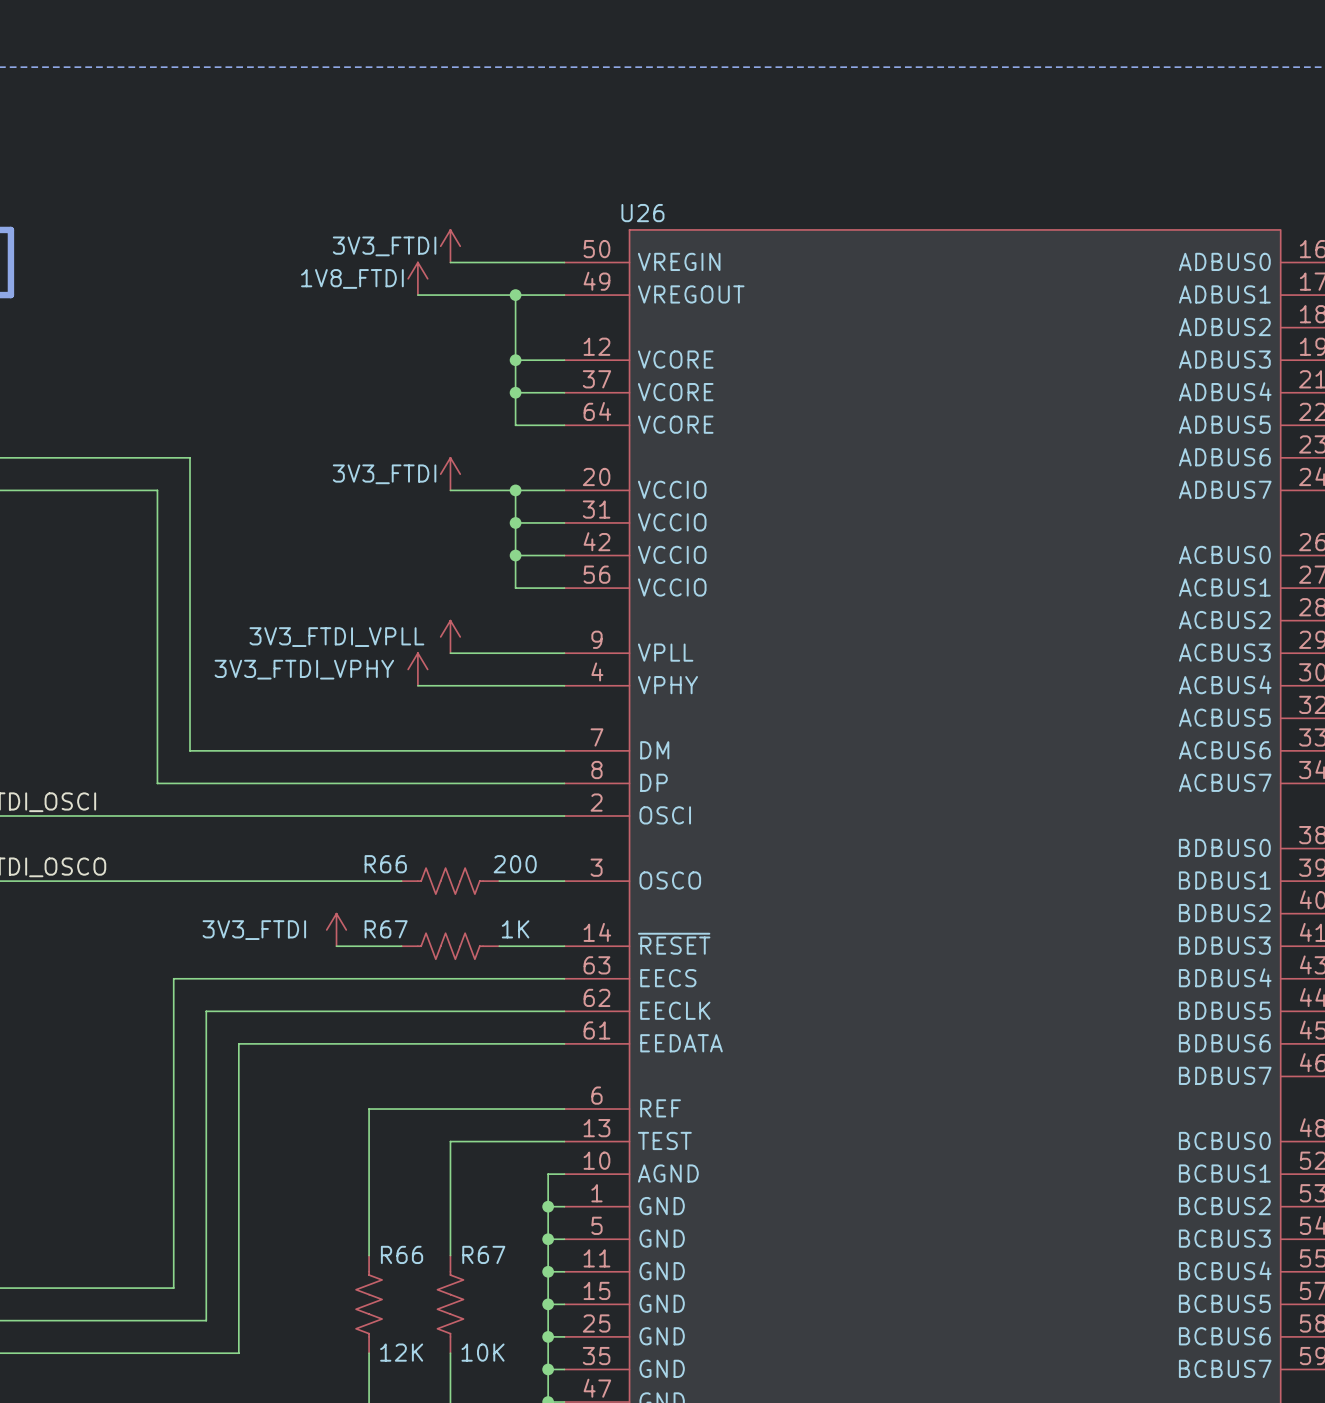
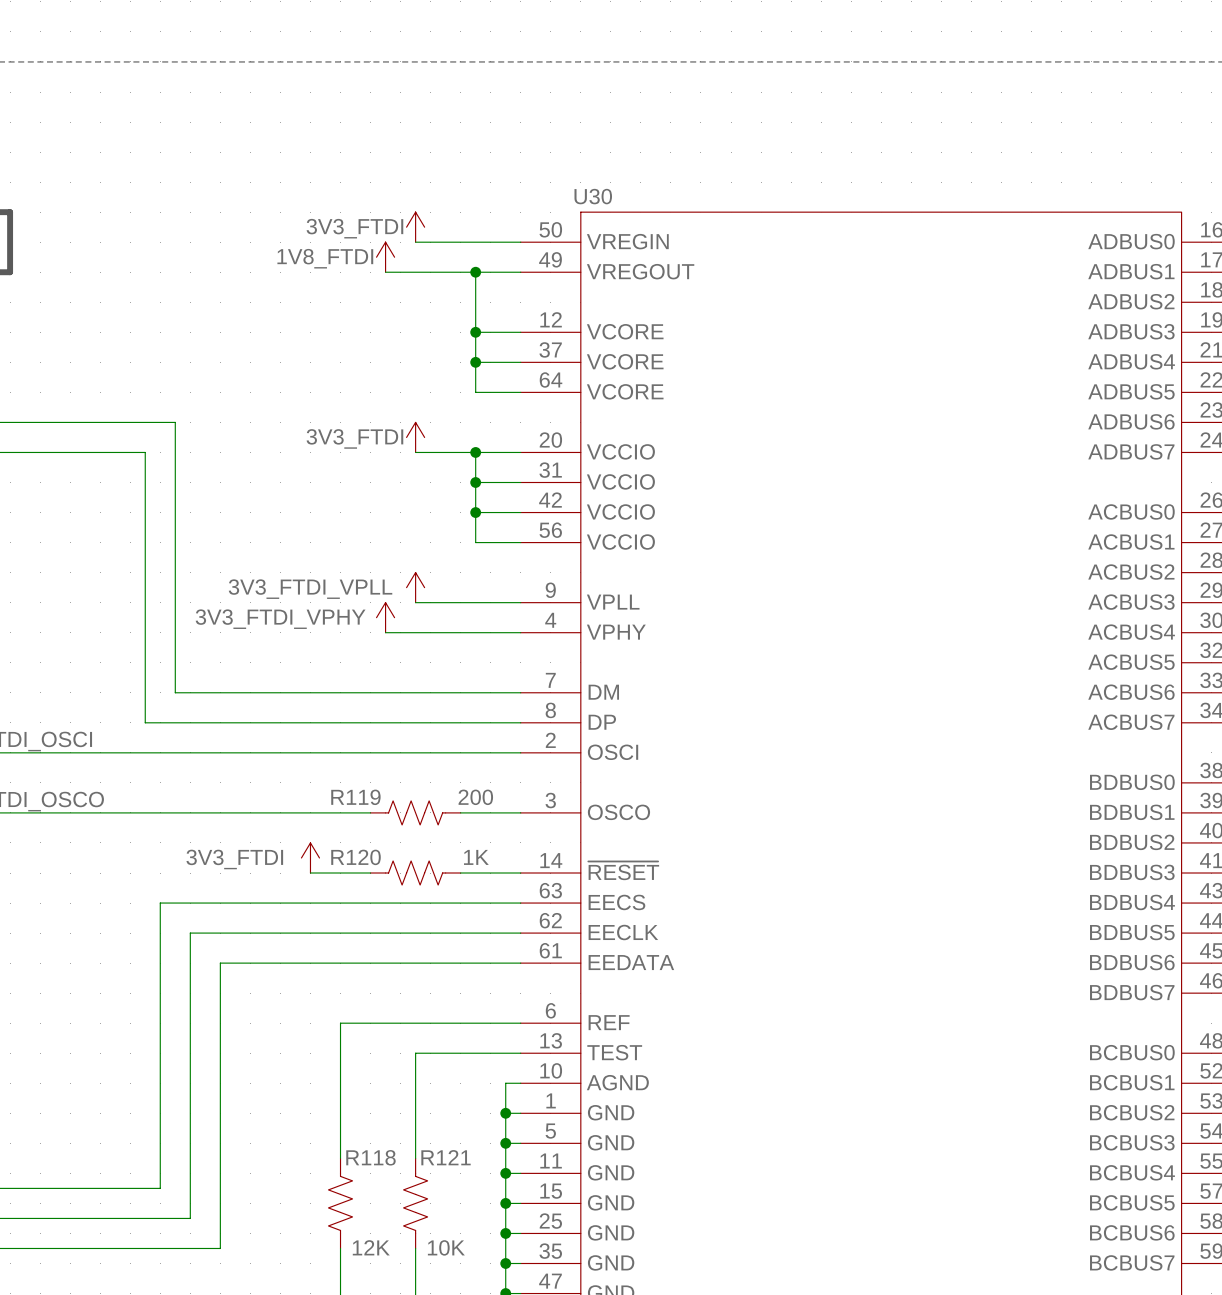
U26 name: U26 (642, 213) -> U30 (593, 196)
R66 name: R66 (385, 864) -> R119 (355, 797)
R67 name: R67 (386, 929) -> R120 (356, 857)
R66 name: R66 (402, 1254) -> R118 (370, 1157)
R67 name: R67 (483, 1254) -> R121 (446, 1157)

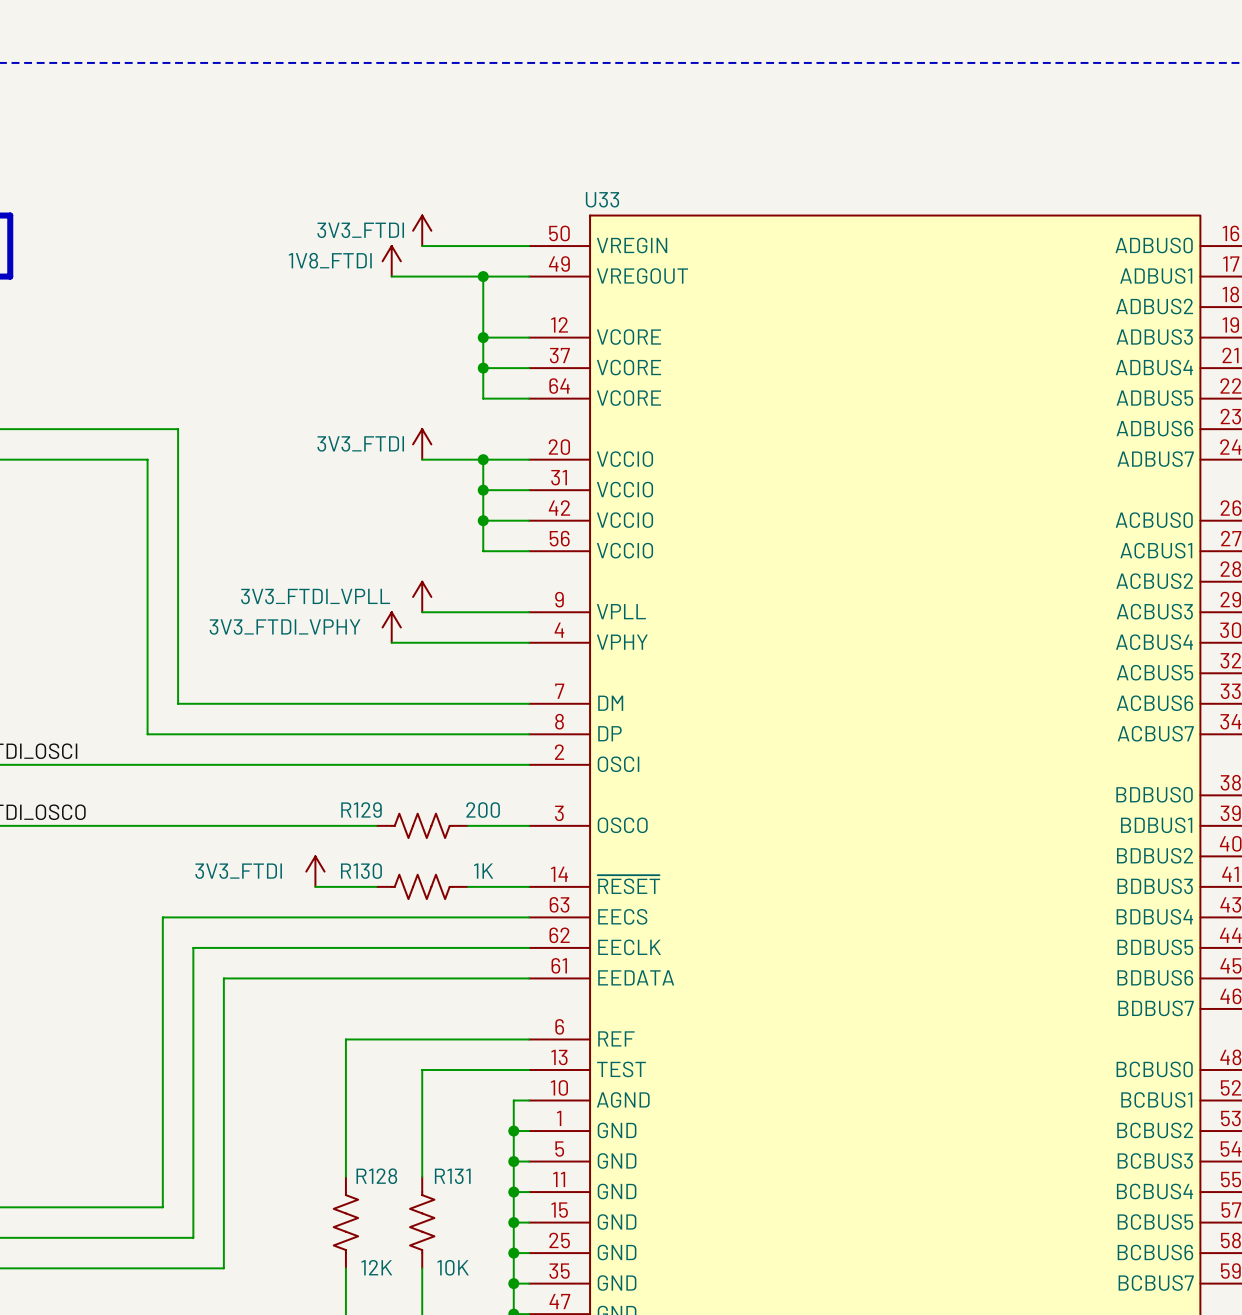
U30 name: U30 (593, 196) -> U33 (602, 199)
R119 name: R119 (355, 797) -> R129 (361, 810)
R120 name: R120 (356, 857) -> R130 (361, 871)
R118 name: R118 (370, 1157) -> R128 (376, 1176)
R121 name: R121 (446, 1157) -> R131 (452, 1176)

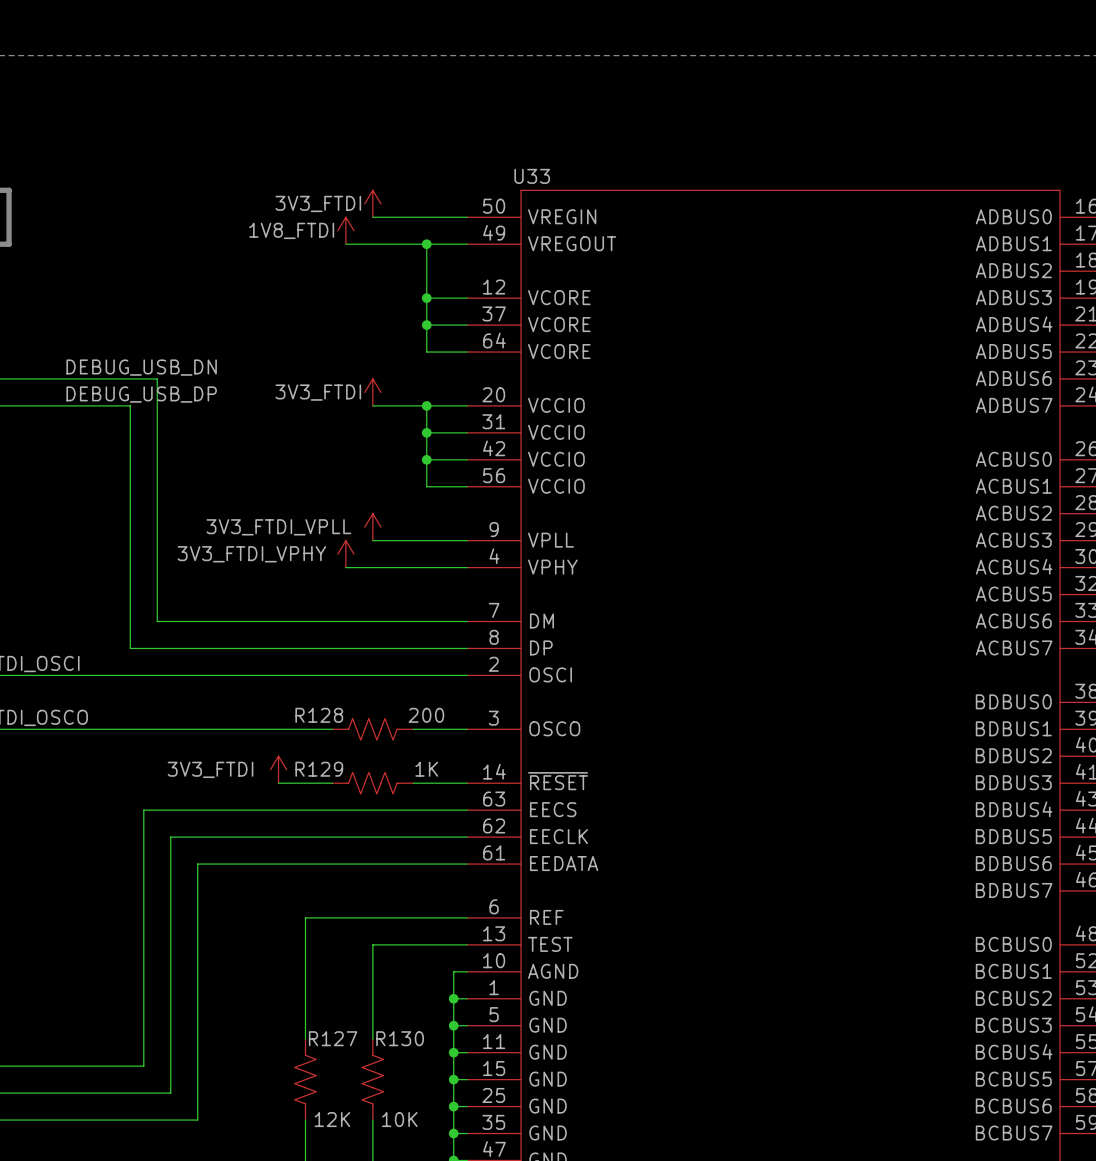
label: none -> DEBUG_USB_DN (141, 367)
label: none -> DEBUG_USB_DP (141, 394)
R129 name: R129 (361, 810) -> R128 (319, 715)
R130 name: R130 (361, 871) -> R129 (319, 769)
R128 name: R128 (376, 1176) -> R127 (333, 1038)
R131 name: R131 (452, 1176) -> R130 (400, 1038)

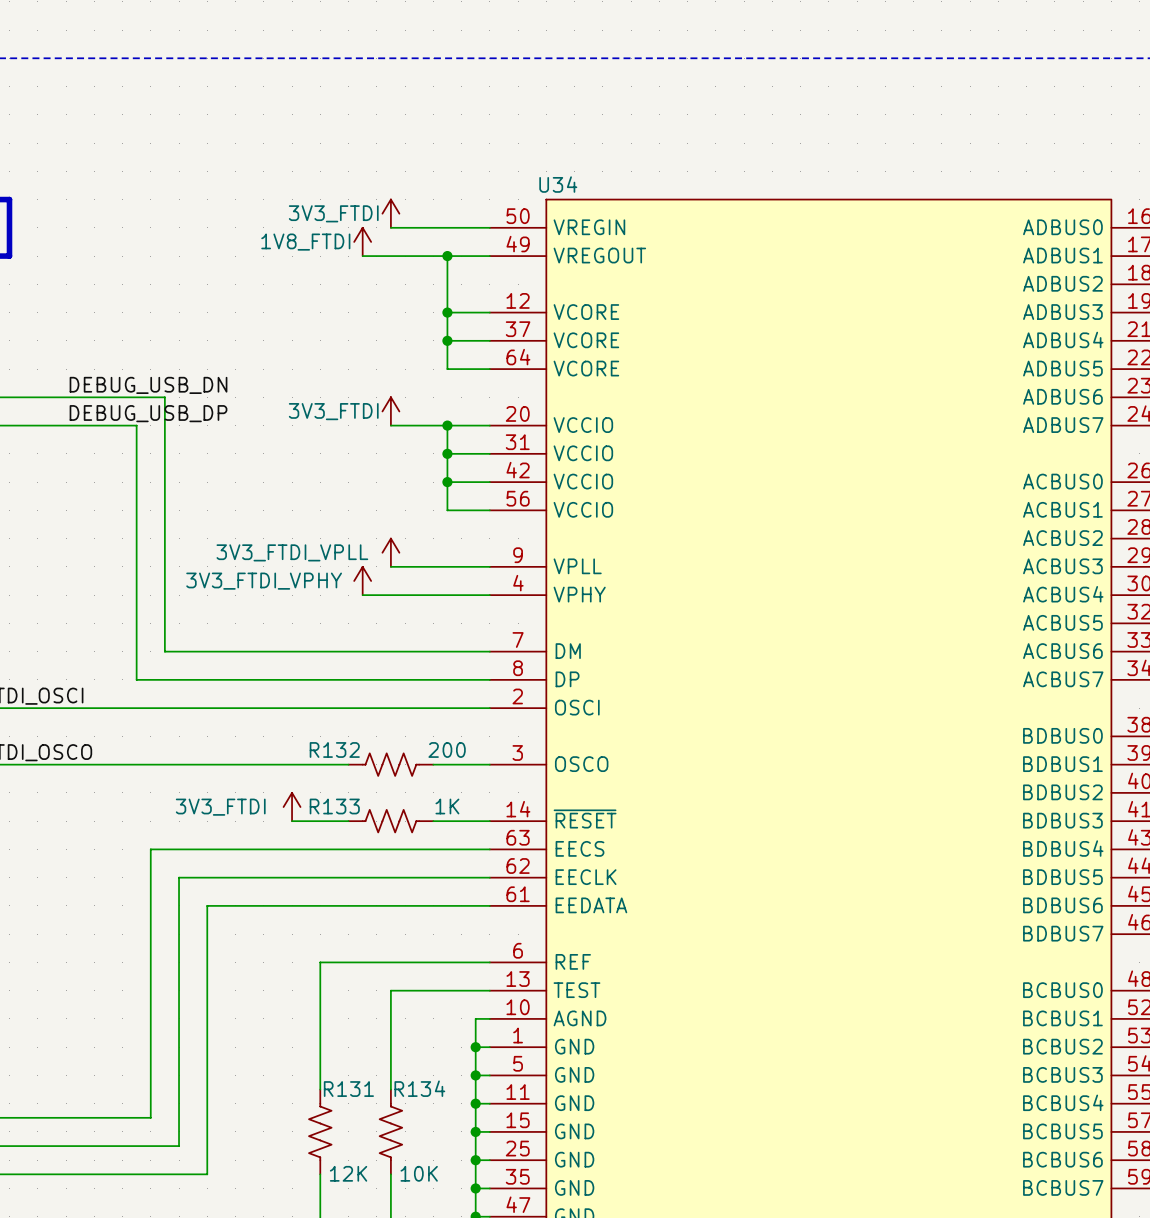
U33 name: U33 (532, 176) -> U34 (558, 184)
R128 name: R128 (319, 715) -> R132 (334, 749)
R129 name: R129 (319, 769) -> R133 (334, 806)
R127 name: R127 (333, 1038) -> R131 (348, 1089)
R130 name: R130 (400, 1038) -> R134 (419, 1088)

